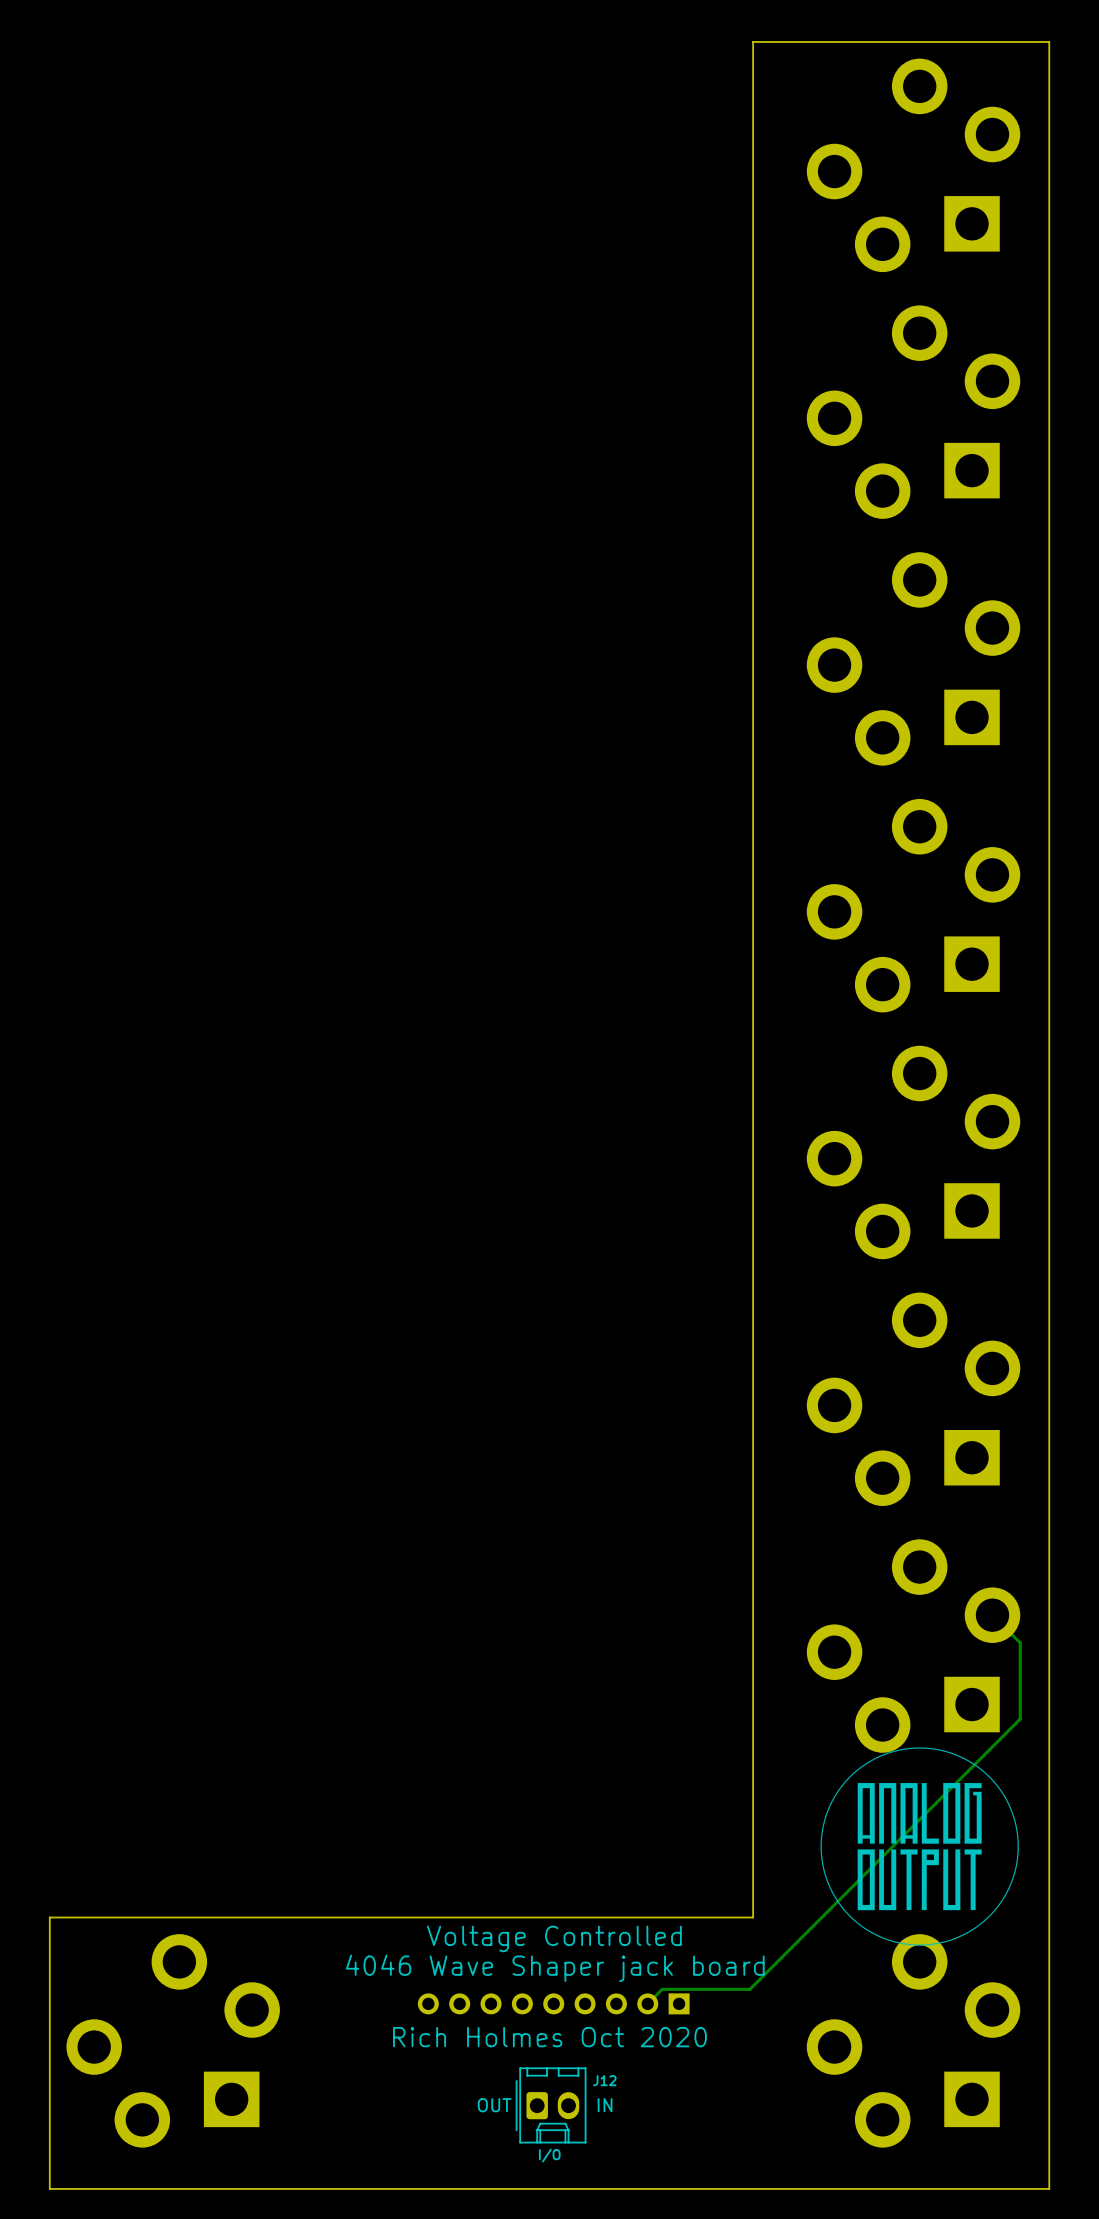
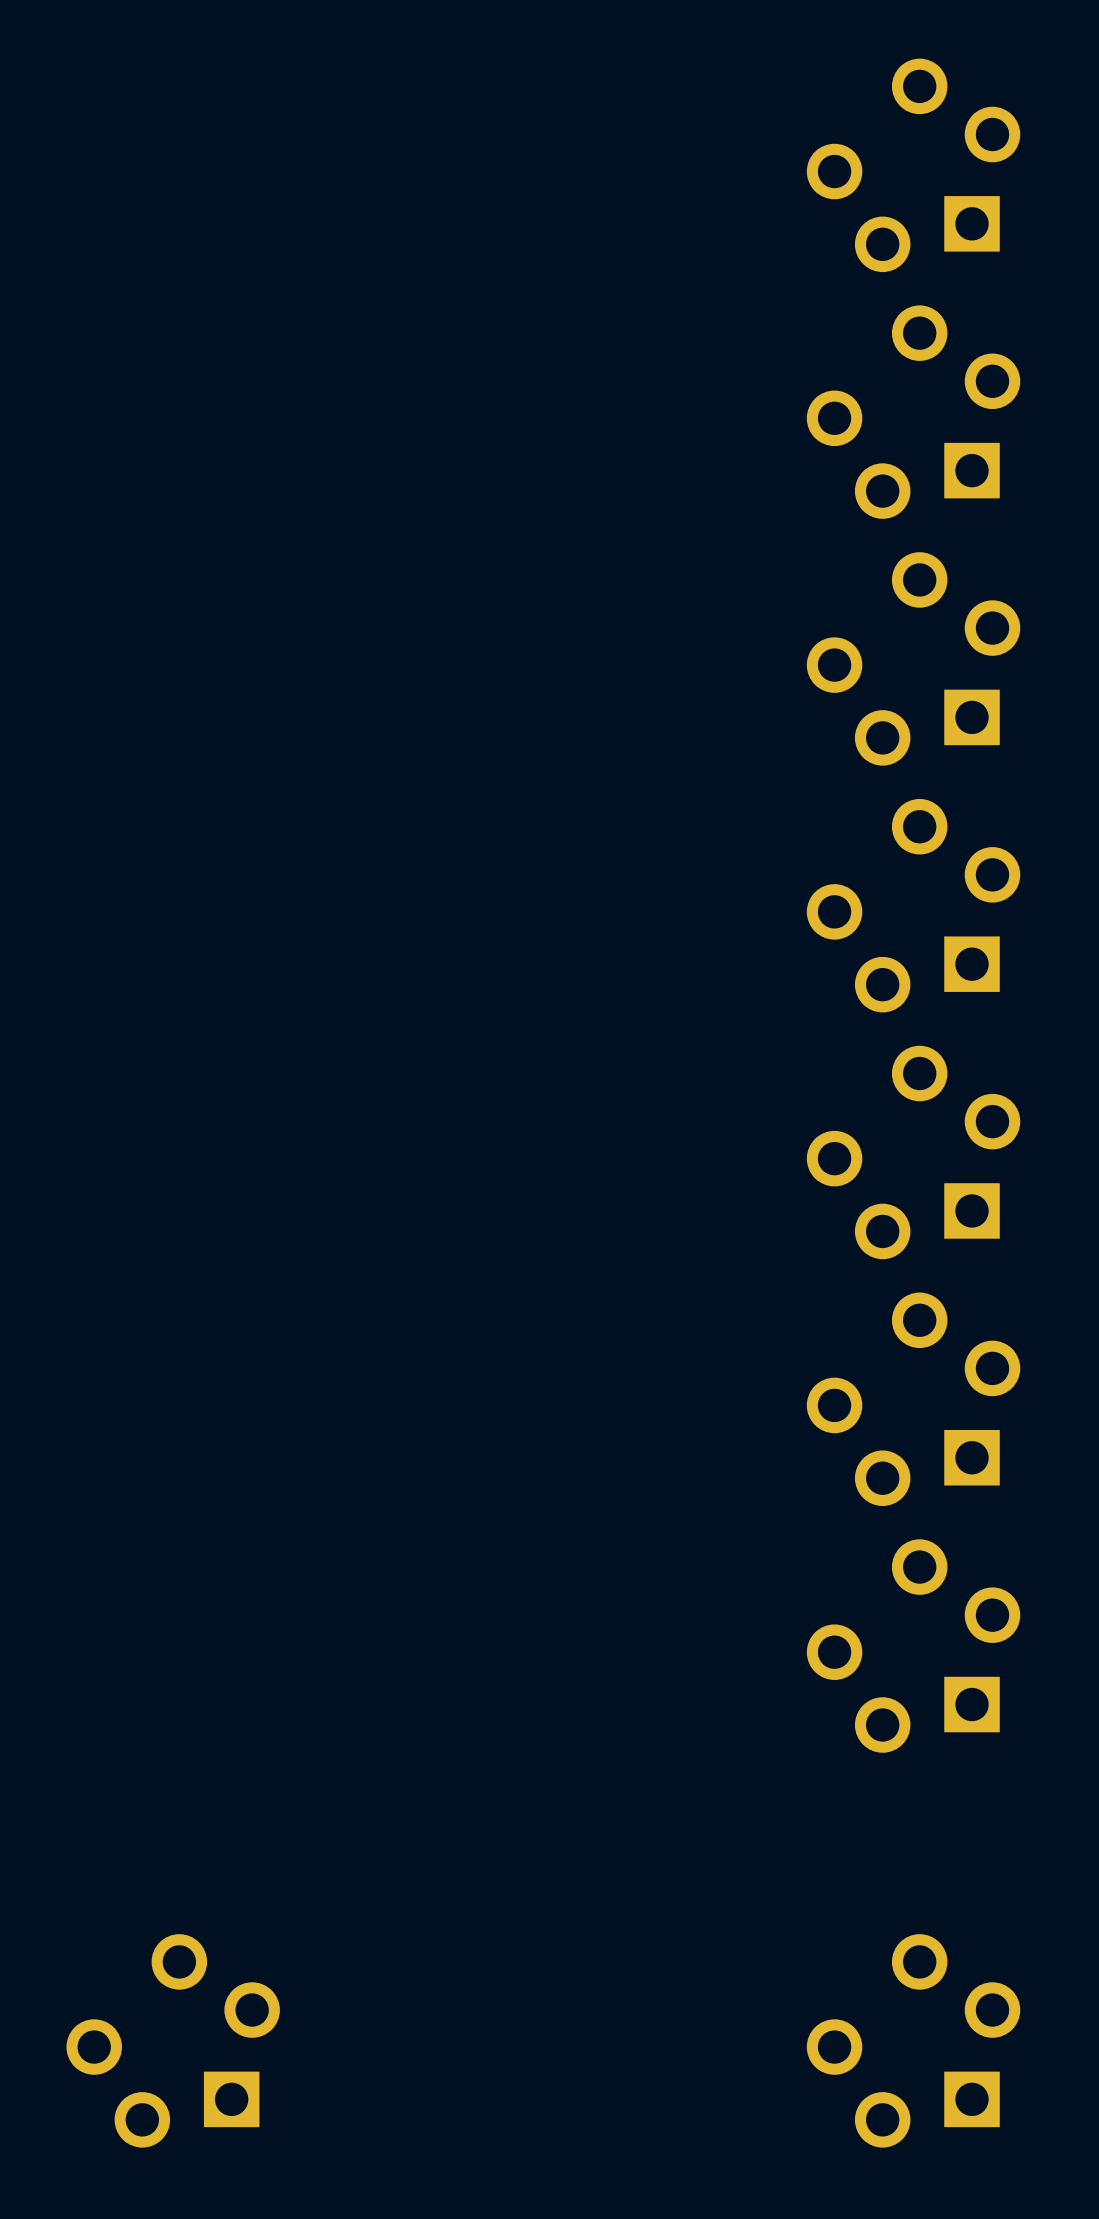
board edge: (1049, 41) (1049, 2188) (49, 2188) (49, 1917) (753, 1917) (753, 41) (1049, 41) -> none
track: (992, 1615) (1020, 1642) (1020, 1719) (749, 1989) (662, 1989) (647, 2003) -> none
drawing: [820, 1747, 1019, 1946] -> none
text: Voltage Controlled (554, 1938) -> none
text: 4046 Wave Shaper jack board (555, 1968) -> none
part: (553, 2003) -> none
text: Rich Holmes Oct 2020 (549, 2037) -> none
text: OUT (494, 2105) -> none
J12: (551, 2105) -> none
text: IN (605, 2105) -> none

